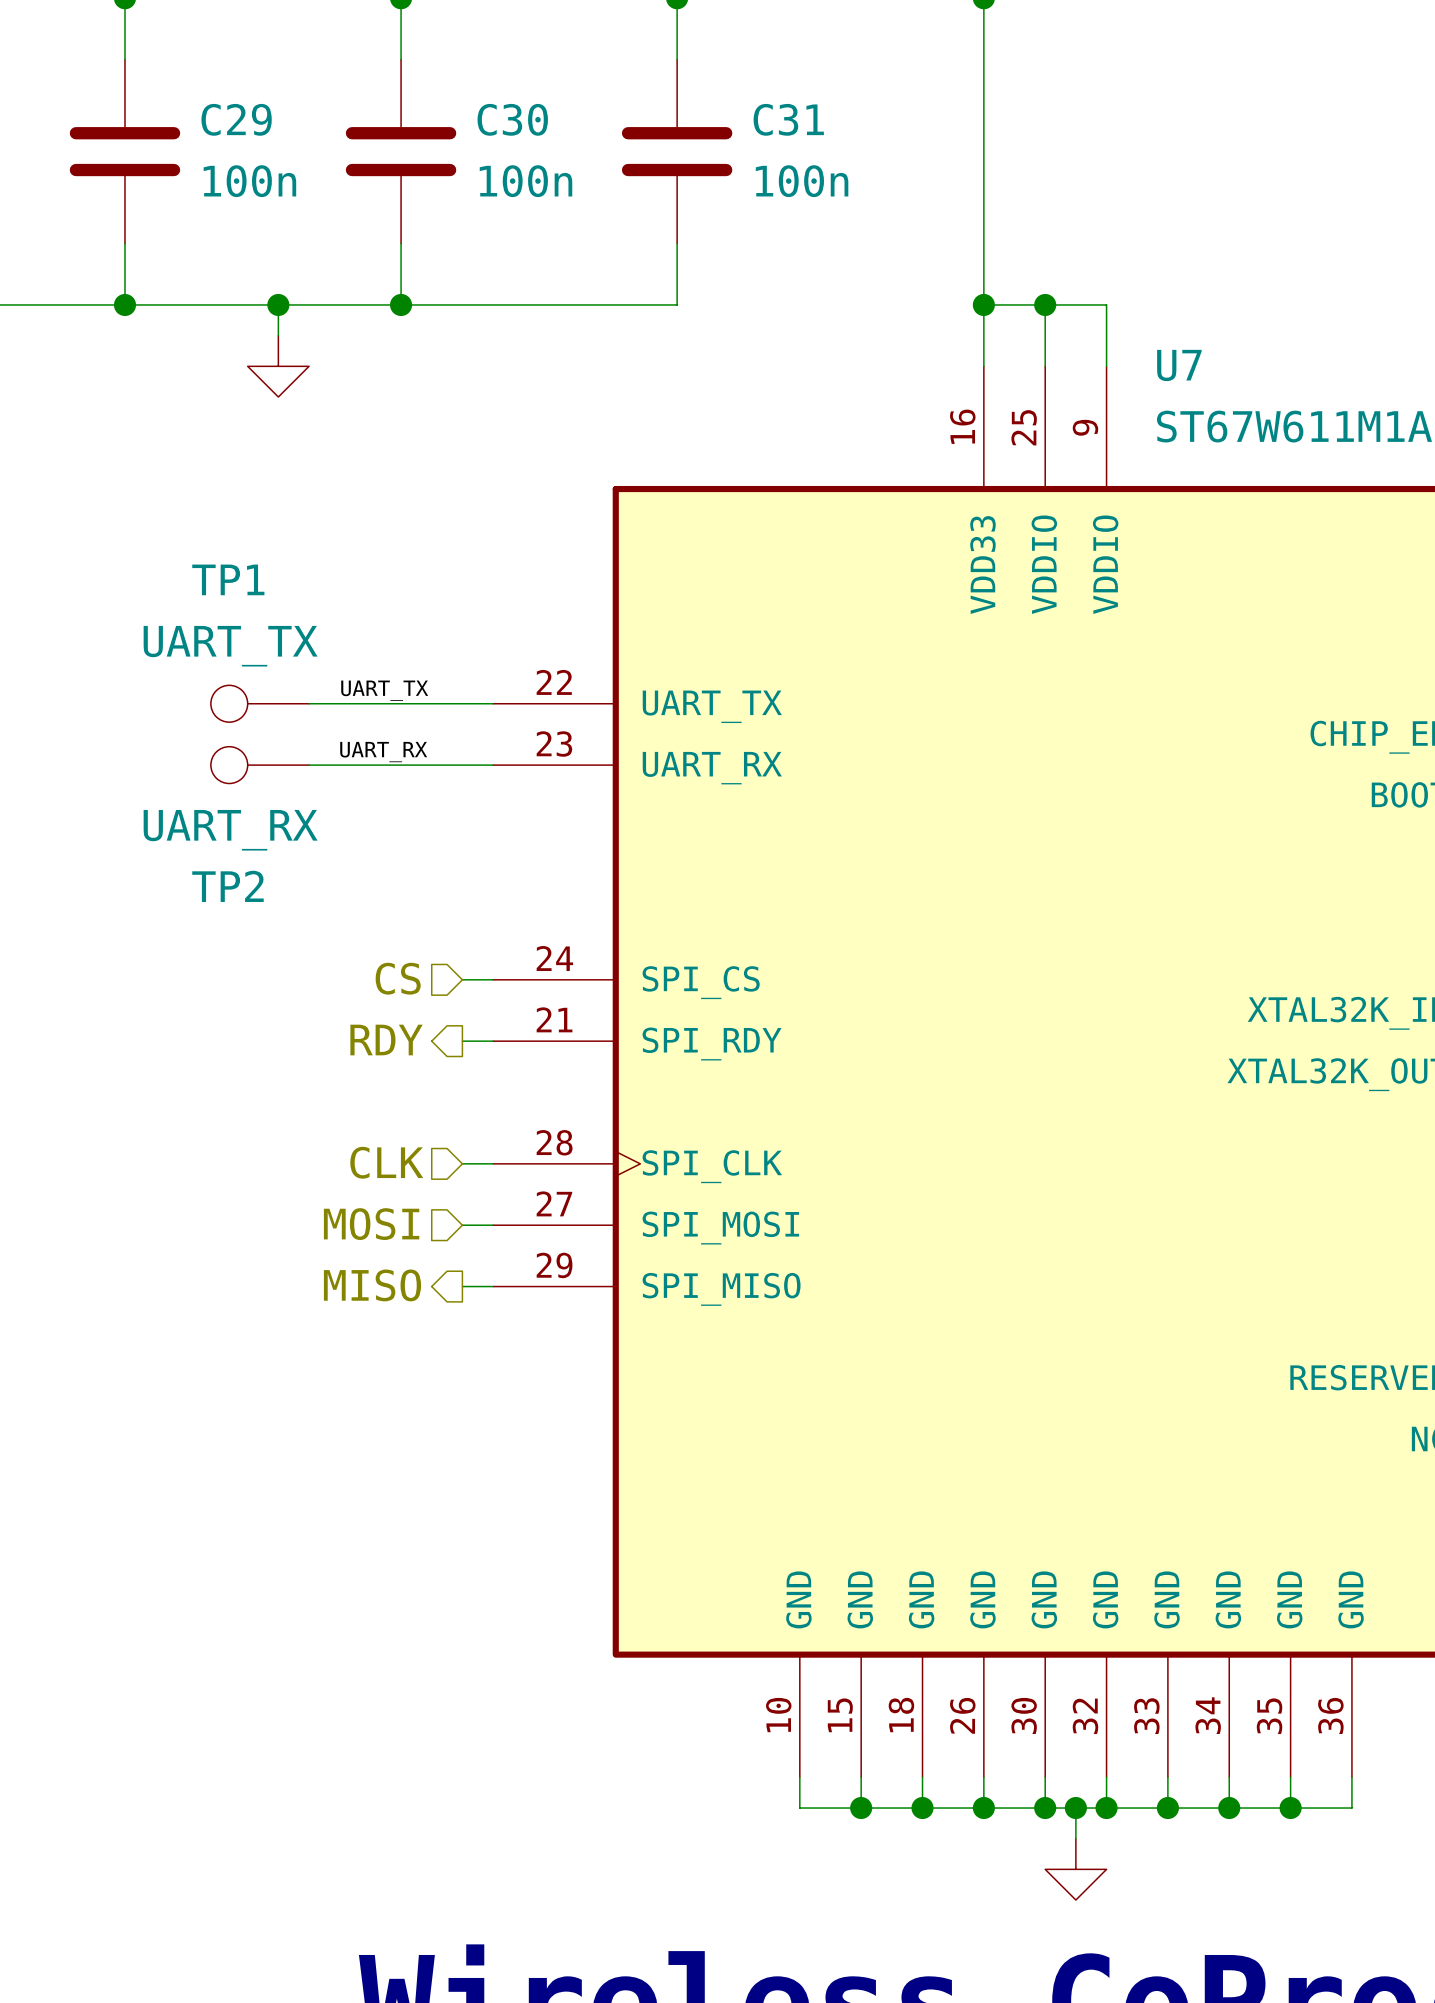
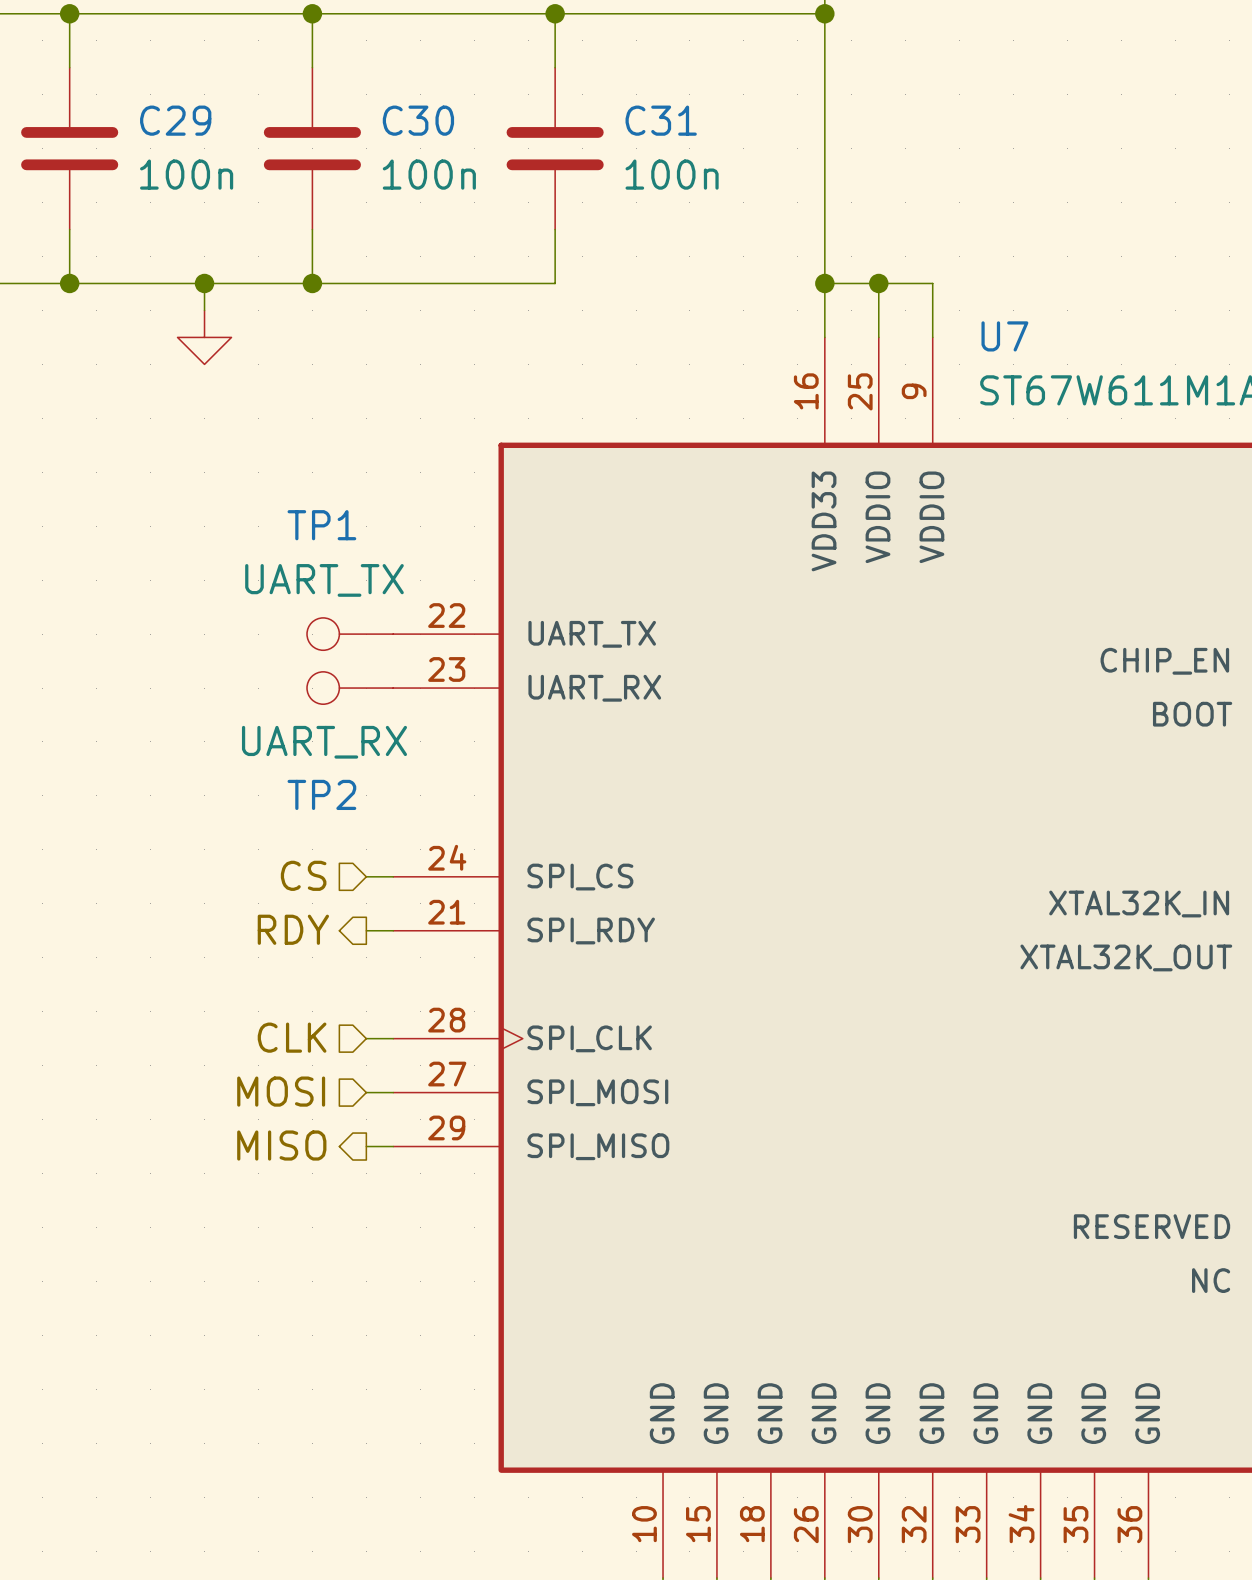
label: UART_TX (384, 690) -> none
TP1 position: (259, 703) -> (350, 634)
wire: (309, 703) (493, 703) -> none
label: UART_RX (383, 752) -> none
TP2 position: (259, 765) -> (350, 688)
wire: (309, 765) (493, 765) -> none

